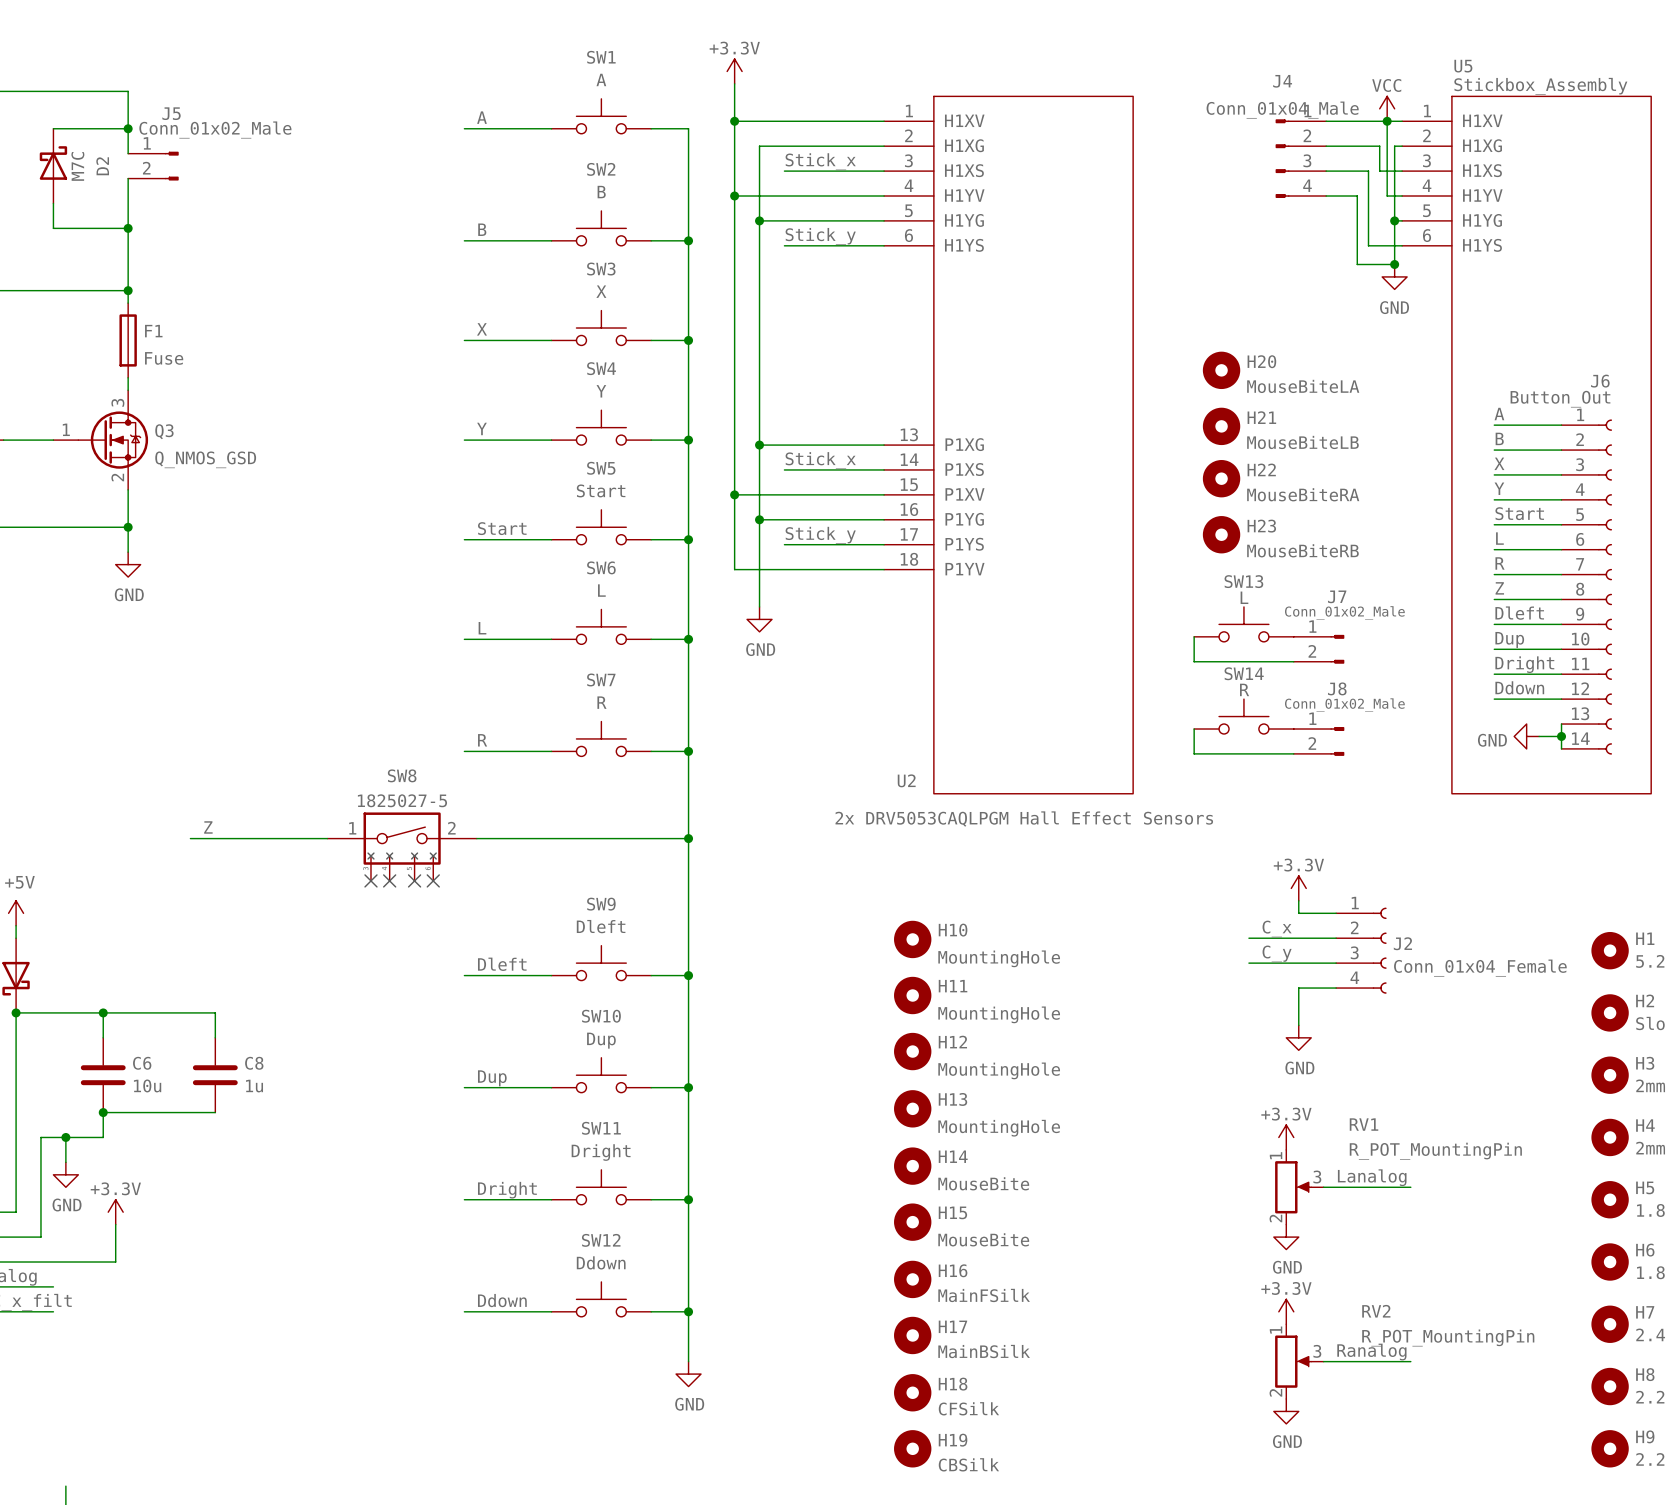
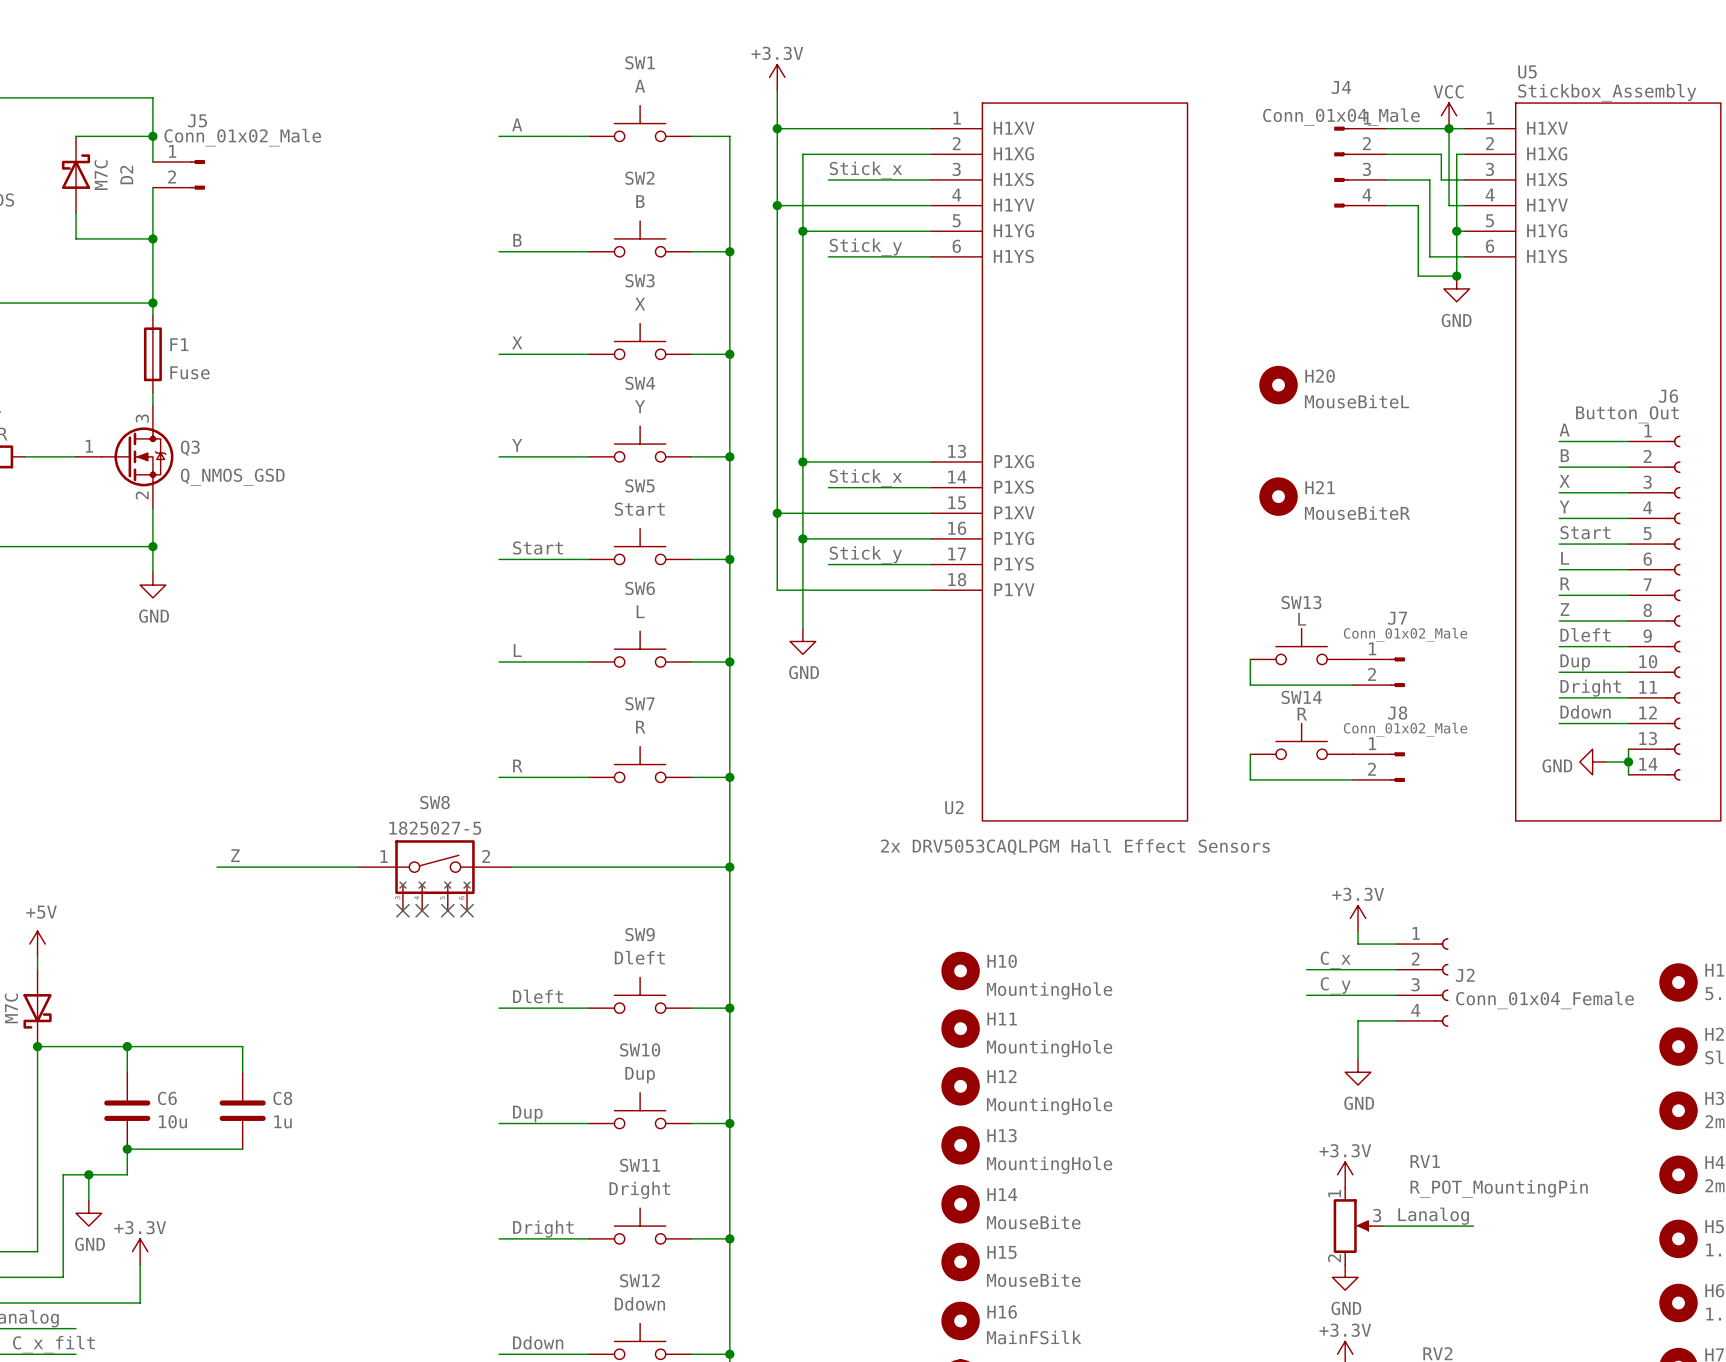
H20 value: MouseBiteLA (1303, 386) -> MouseBiteL (1357, 401)
H21: MouseBiteLB (1221, 426) -> none
H22 name: H22 (1261, 469) -> H21 (1320, 487)
H22 value: MouseBiteRA (1303, 494) -> MouseBiteR (1357, 513)
H23: MouseBiteRB (1221, 534) -> none

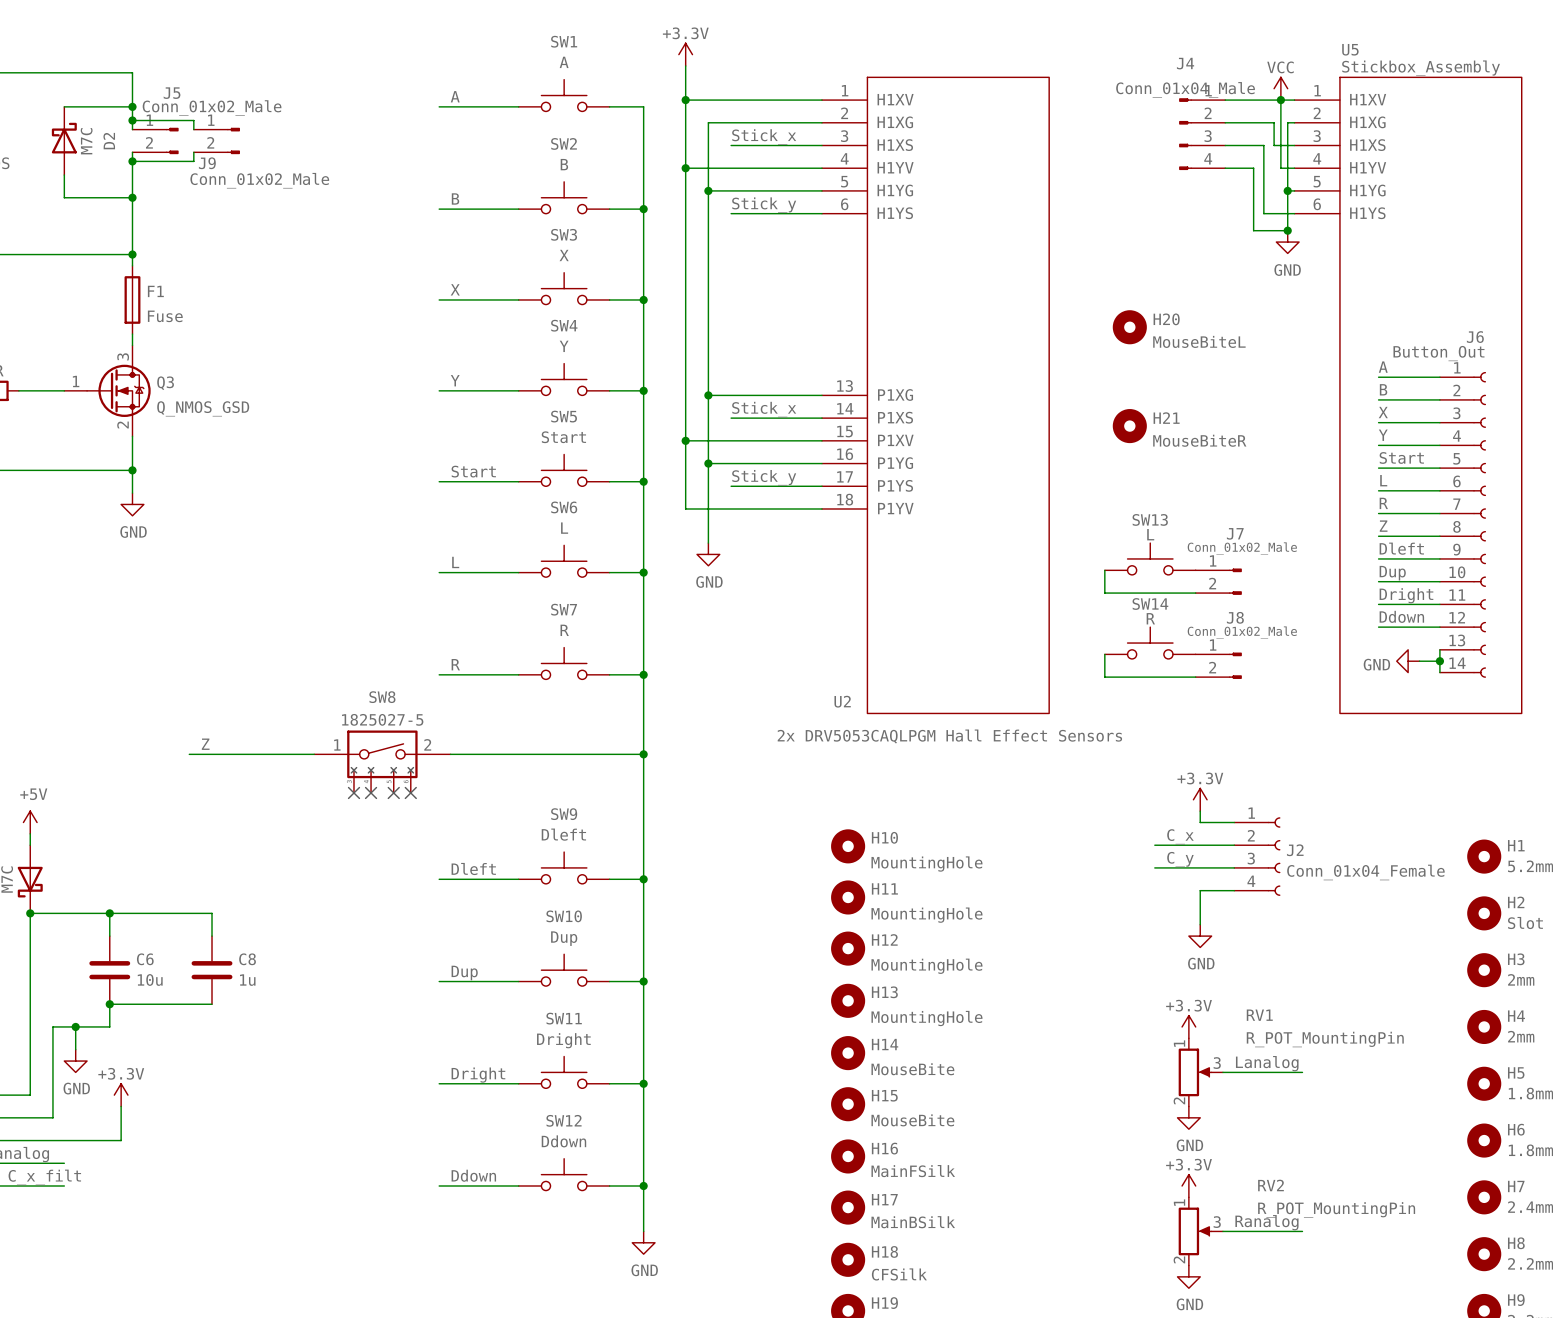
wire: none -> (132, 120) (193, 120) (193, 129)
junction: none -> (132, 120)
J9: none -> Conn_01x02_Male (216, 140)
wire: none -> (193, 152) (193, 161) (132, 161)
junction: none -> (132, 161)

